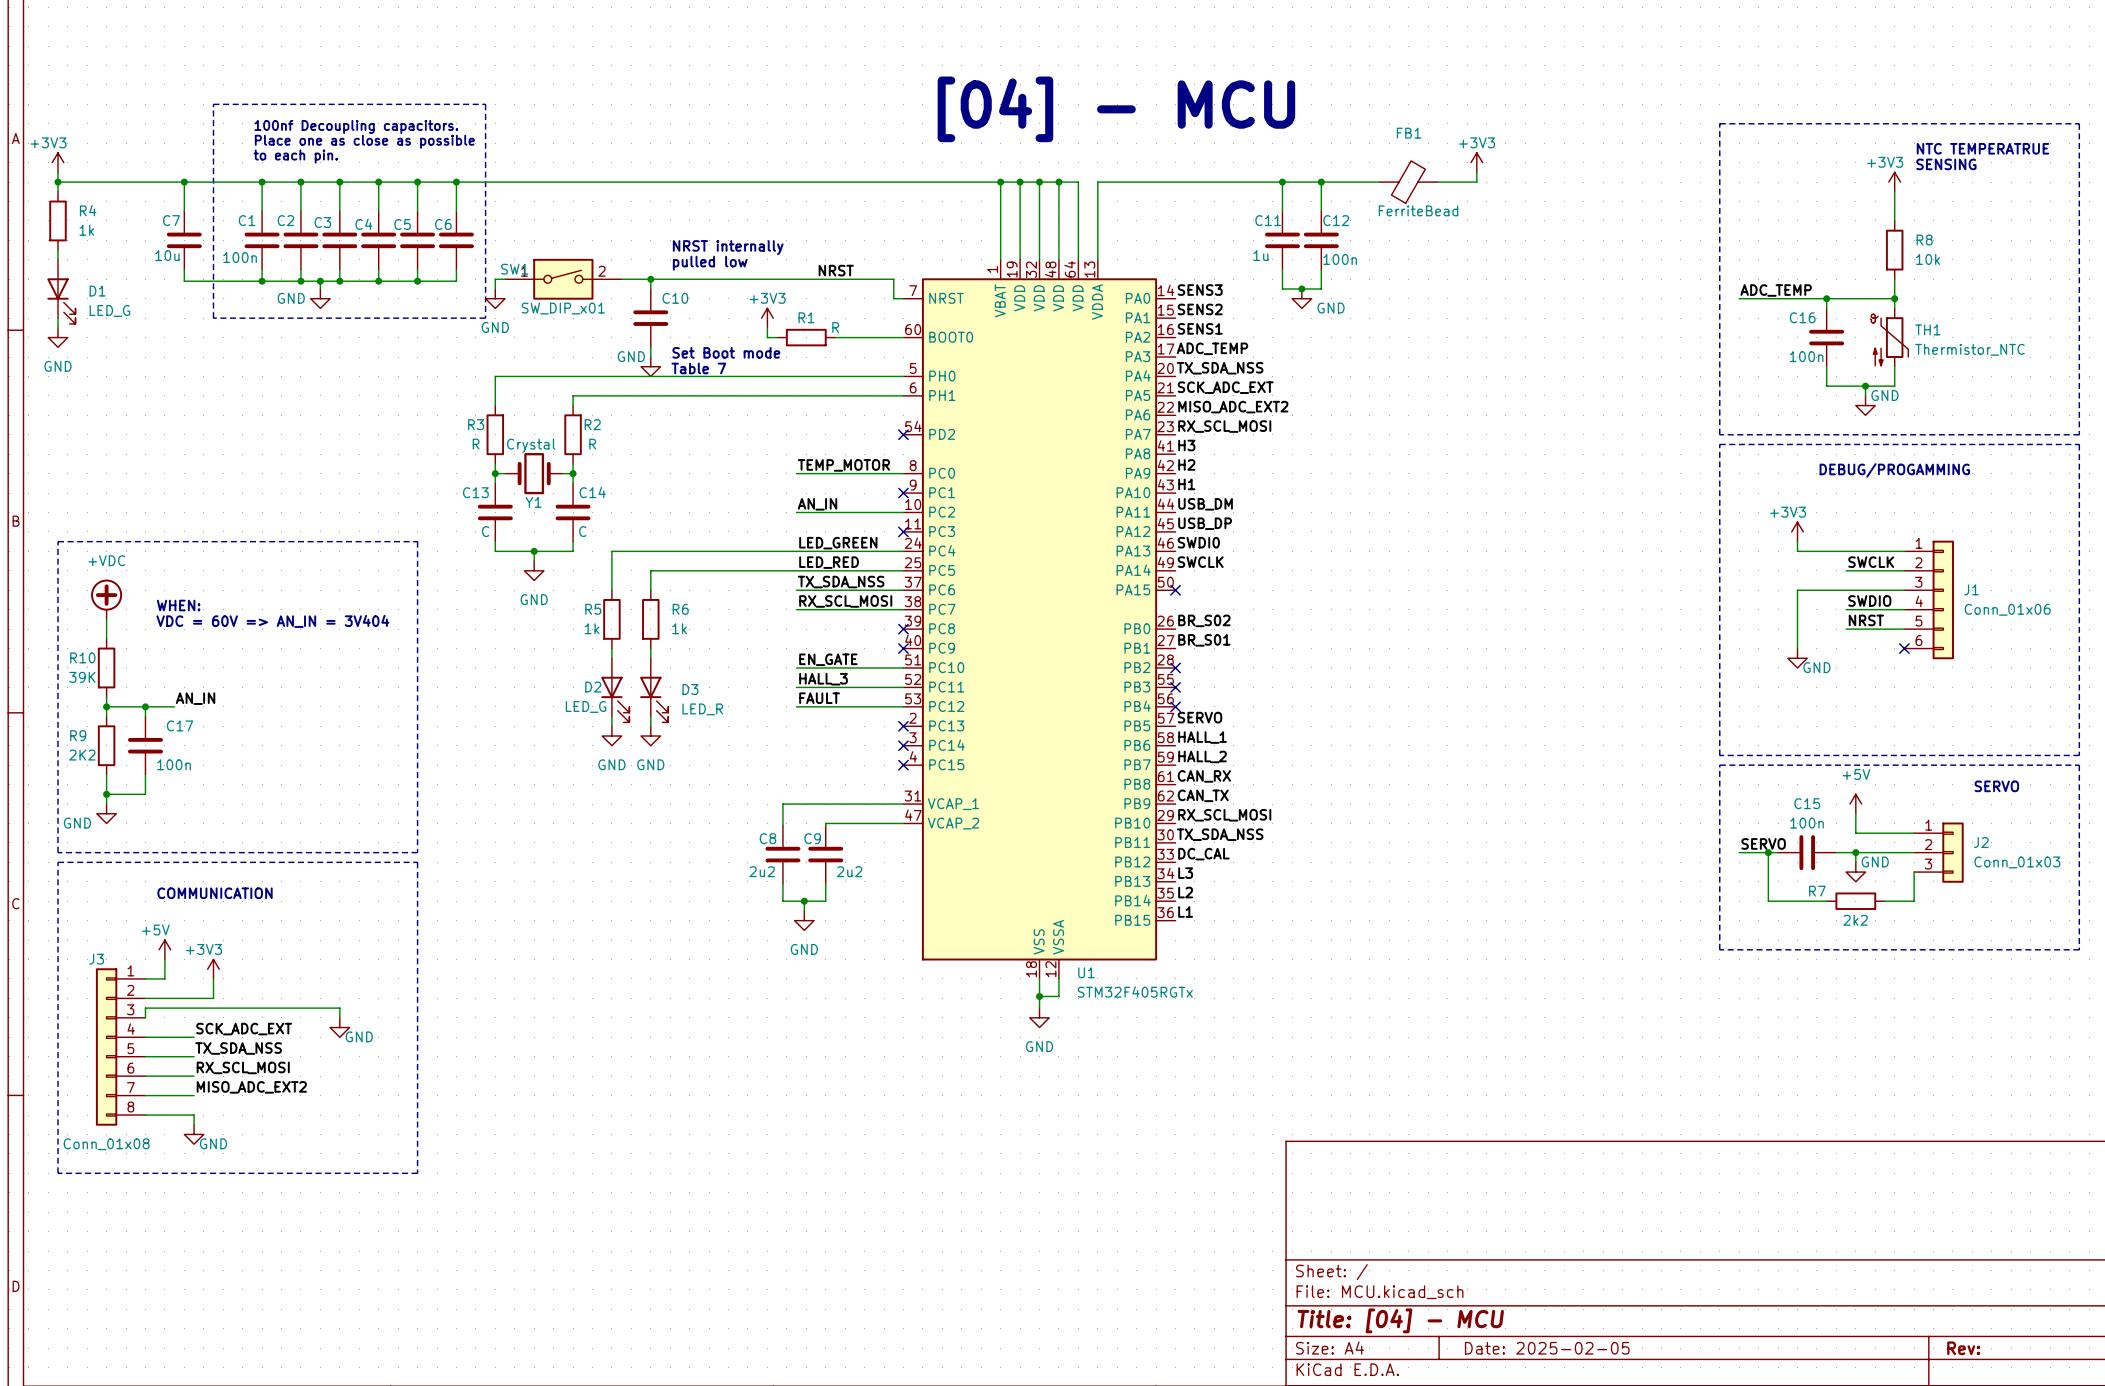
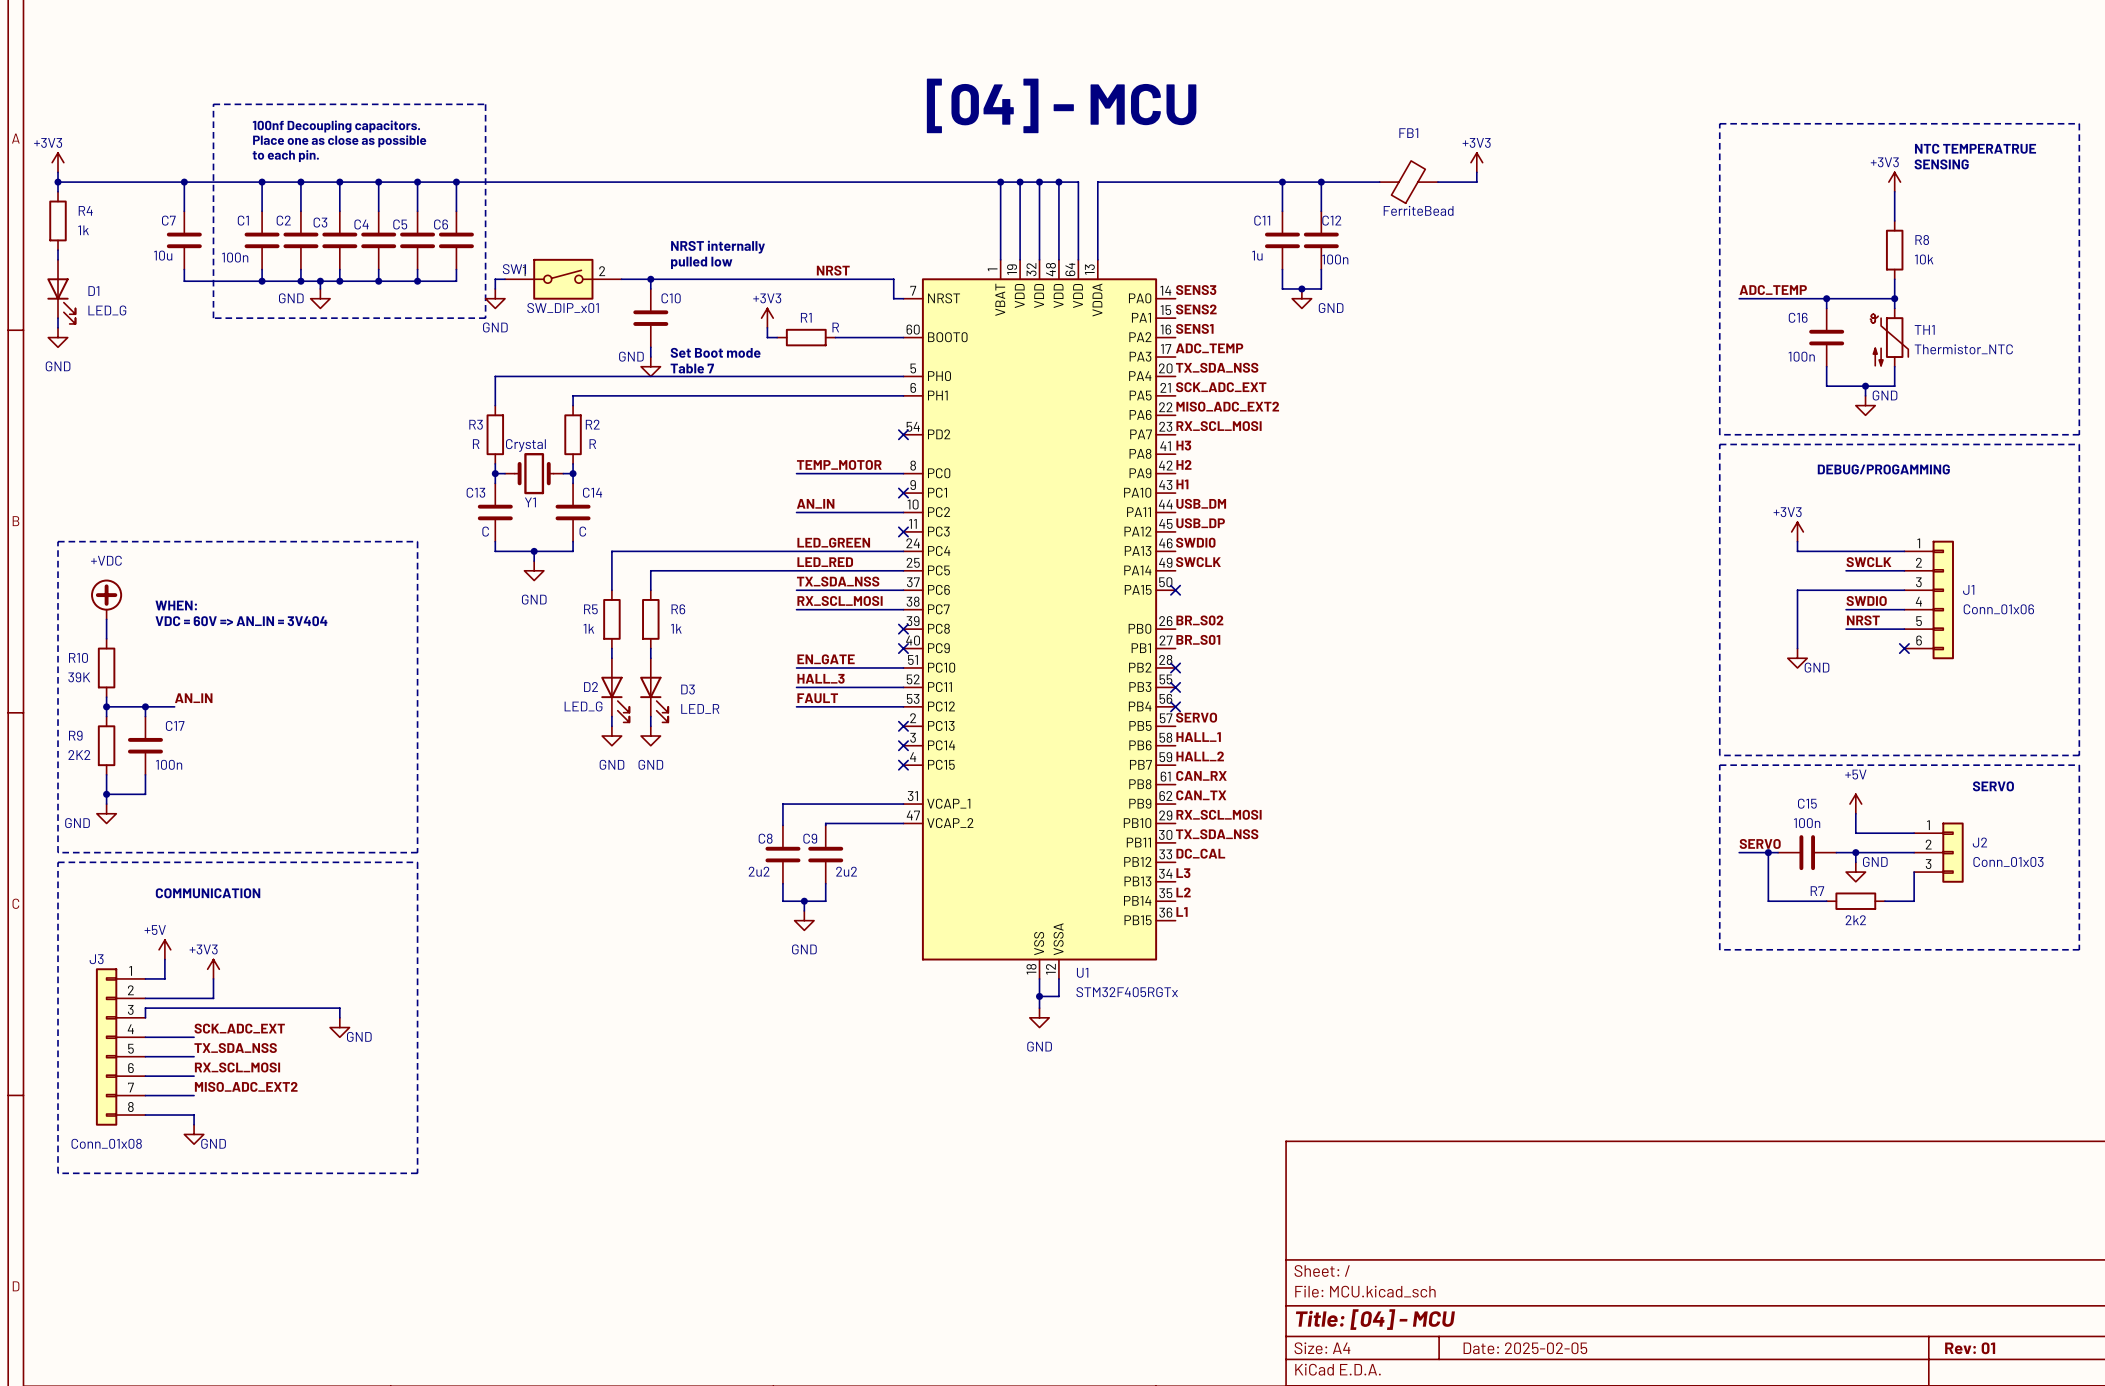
title block: Rev: (1963, 1348) -> Rev: 01 (1970, 1348)

